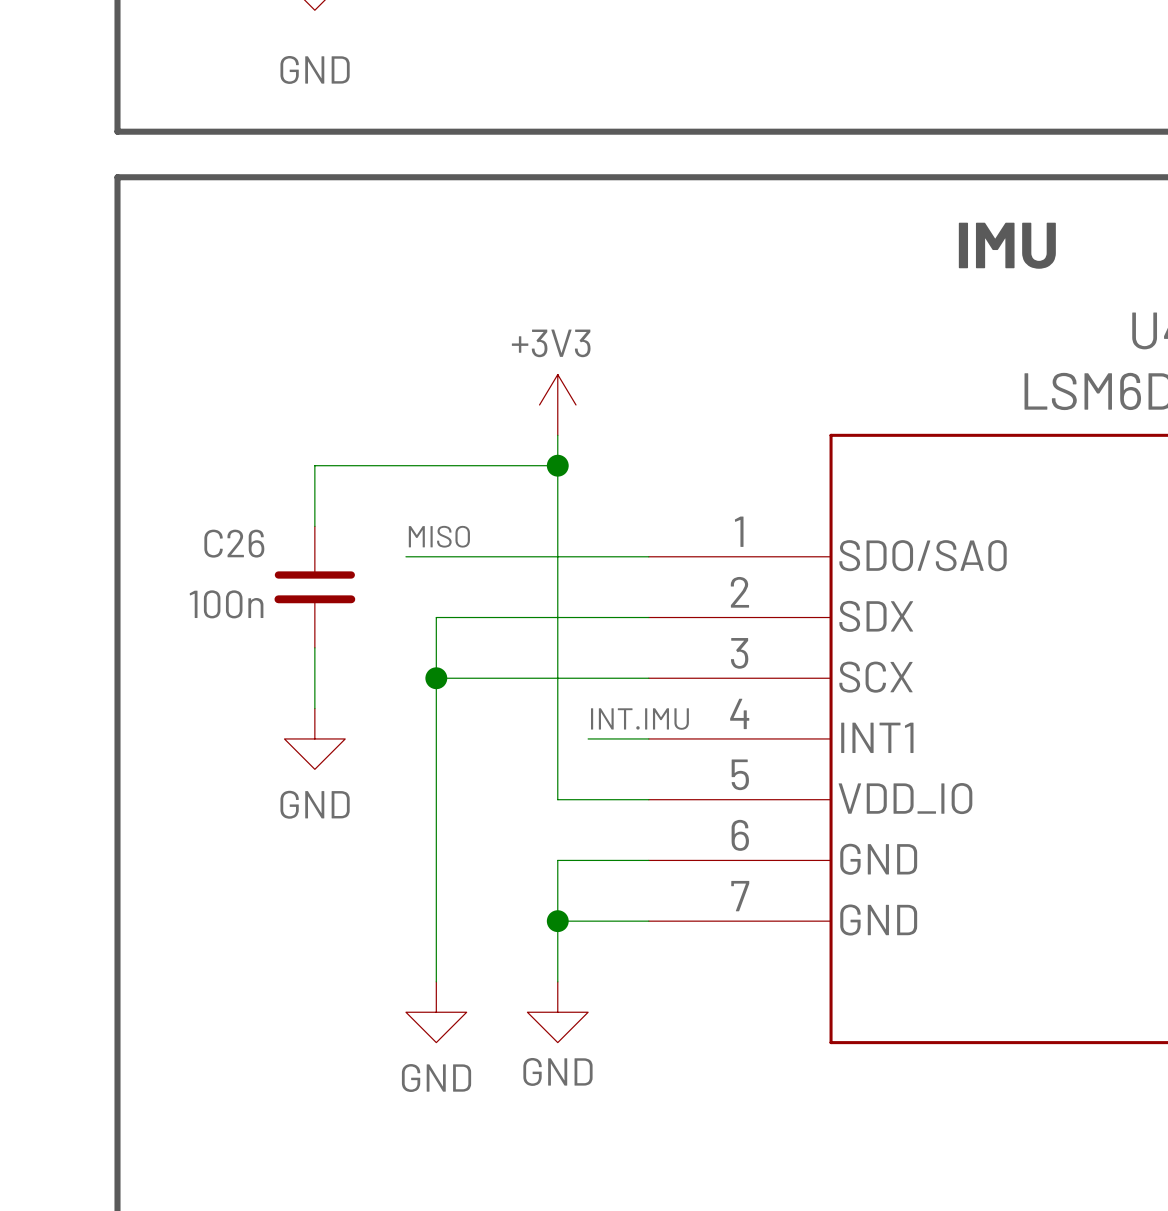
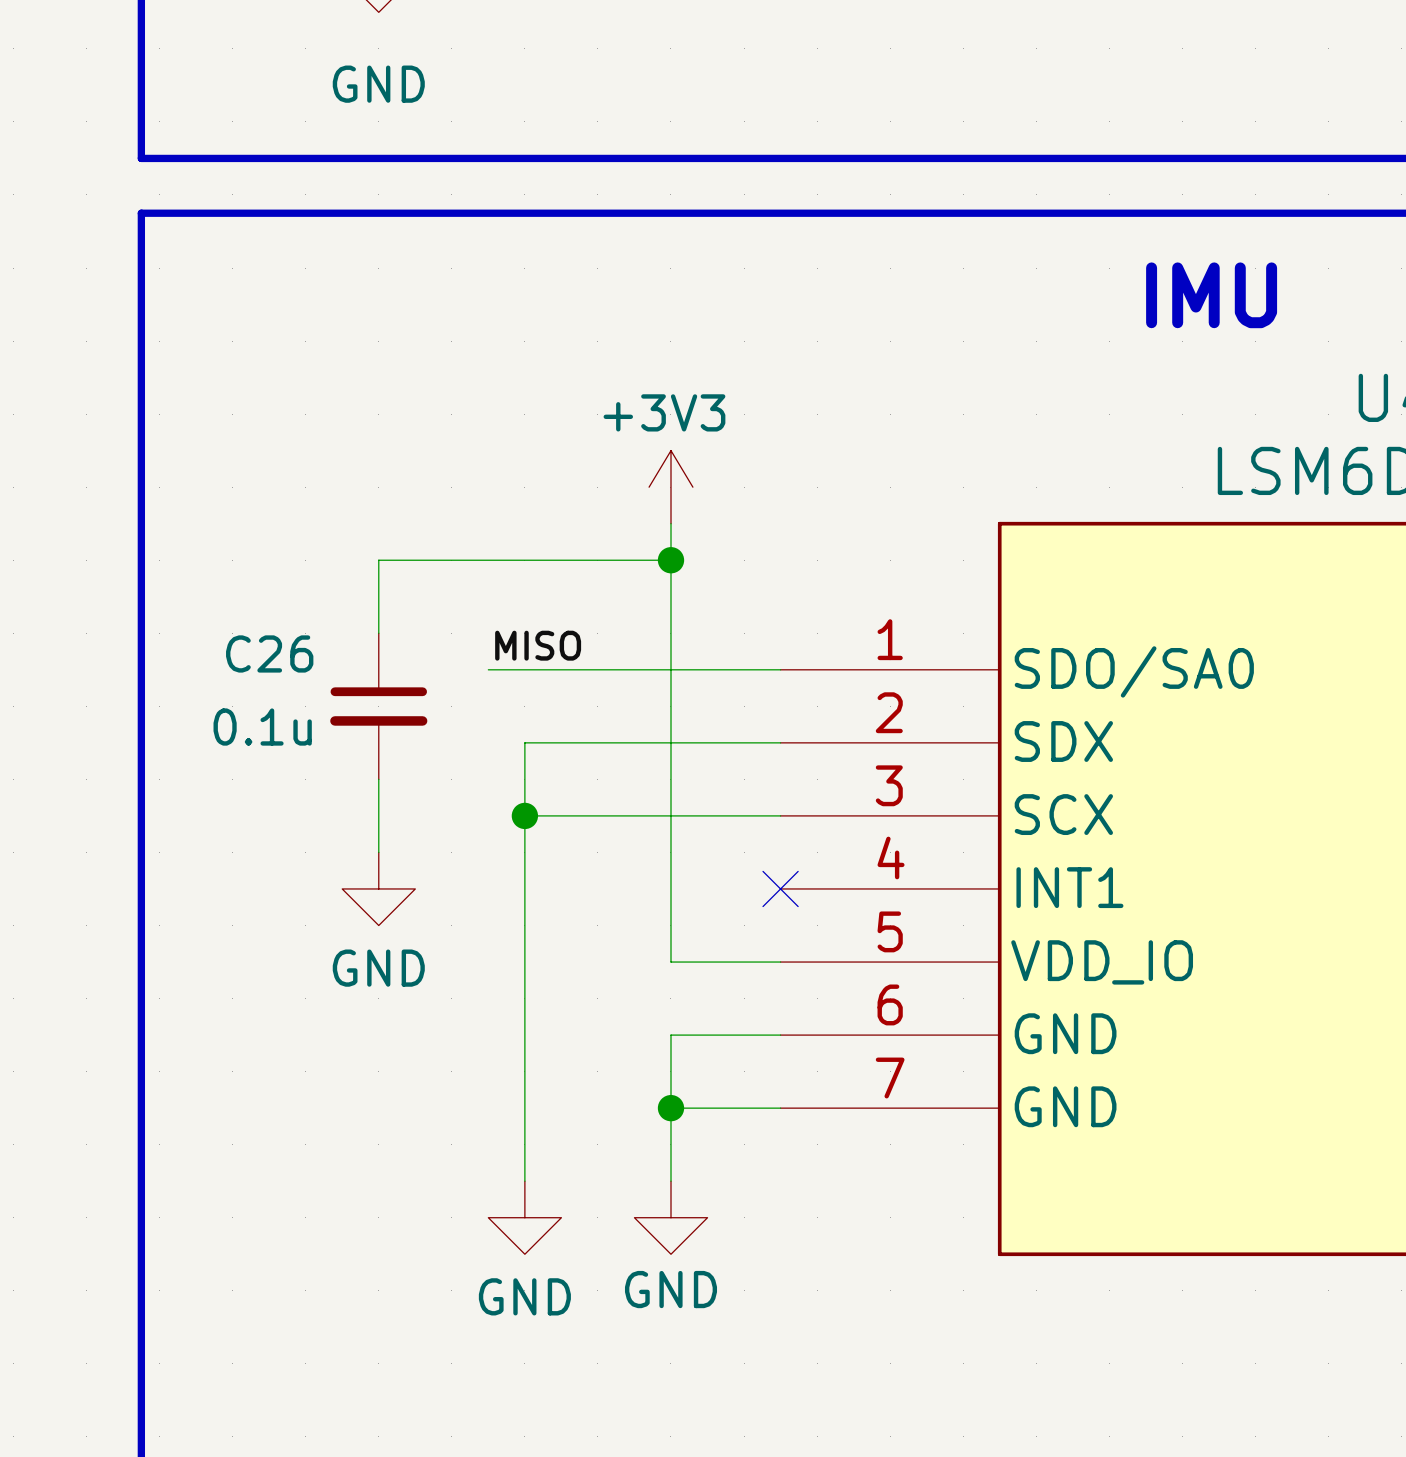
C26 value: 100n (226, 604) -> 0.1u (262, 727)
label: INT.IMU (639, 719) -> none
wire: (588, 738) (648, 738) -> none
no-connect mark: none -> (780, 888)

